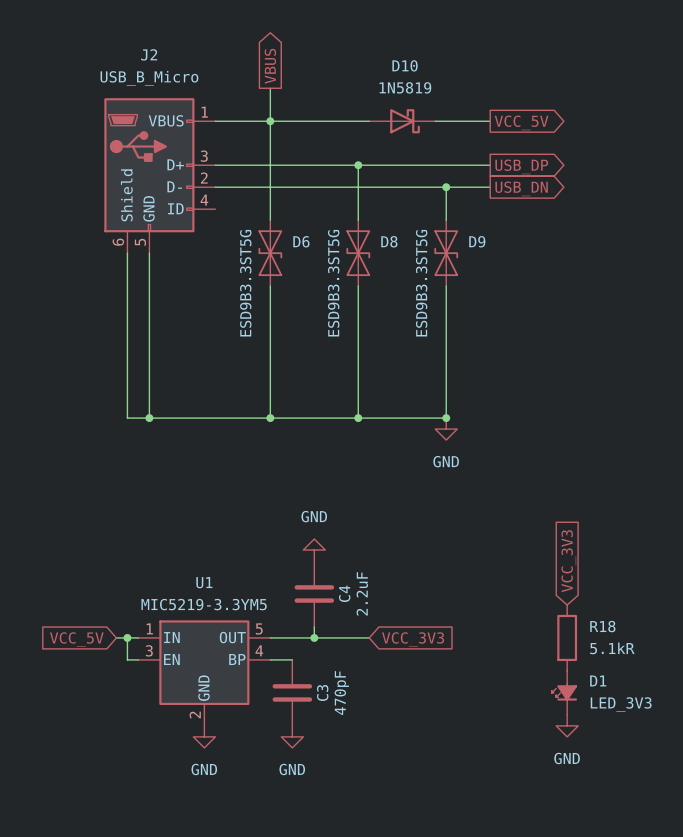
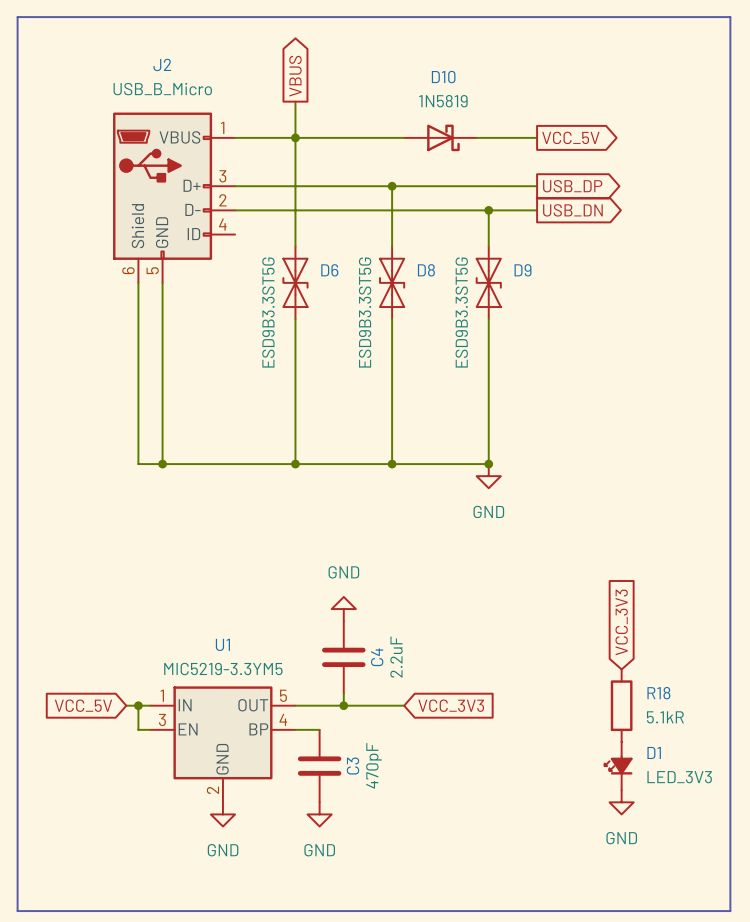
line: none -> (17, 17) (730, 17) (730, 911) (17, 911) (17, 17)

